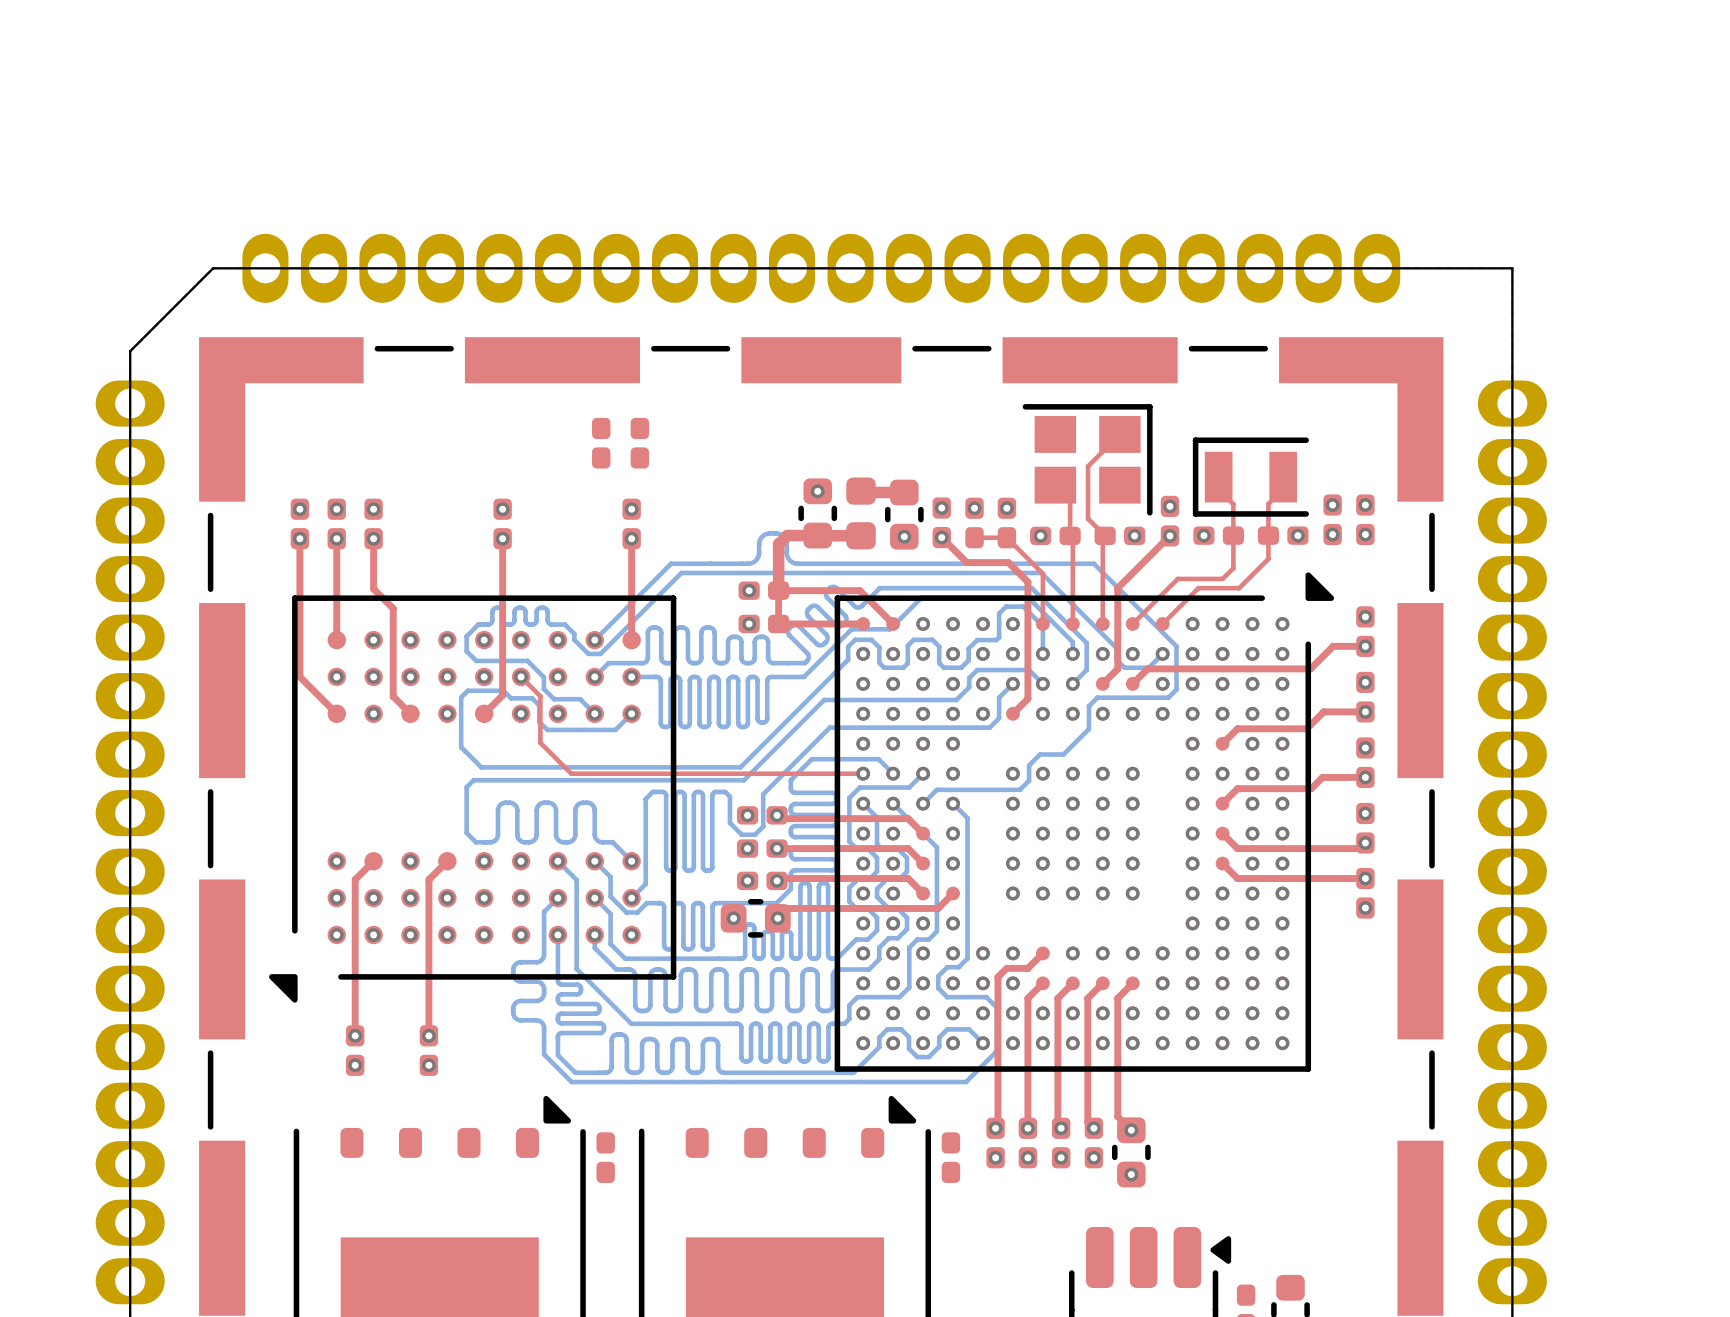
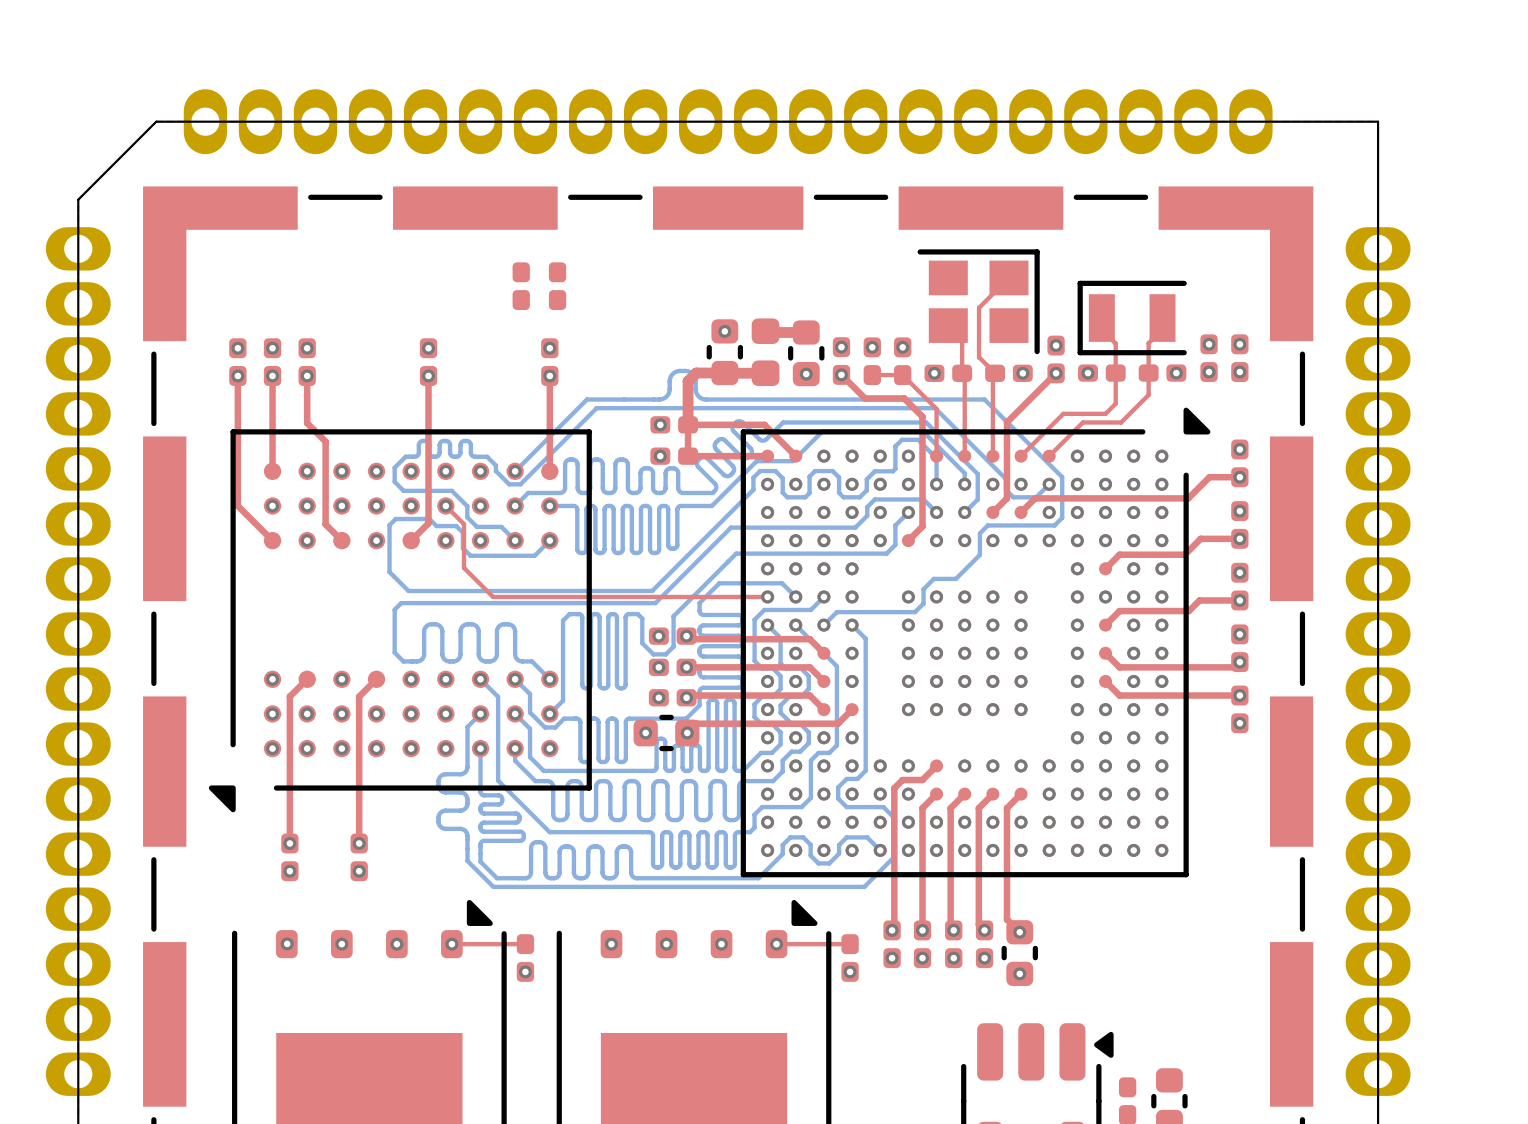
via: none -> (287, 943)
via: none -> (341, 944)
via: none -> (396, 944)
top track: none -> (451, 944) (525, 944)
via: none -> (451, 944)
via: none -> (611, 944)
via: none -> (666, 944)
via: none -> (721, 944)
top track: none -> (776, 944) (850, 944)
via: none -> (776, 944)
via: none -> (525, 971)
via: none -> (850, 971)

